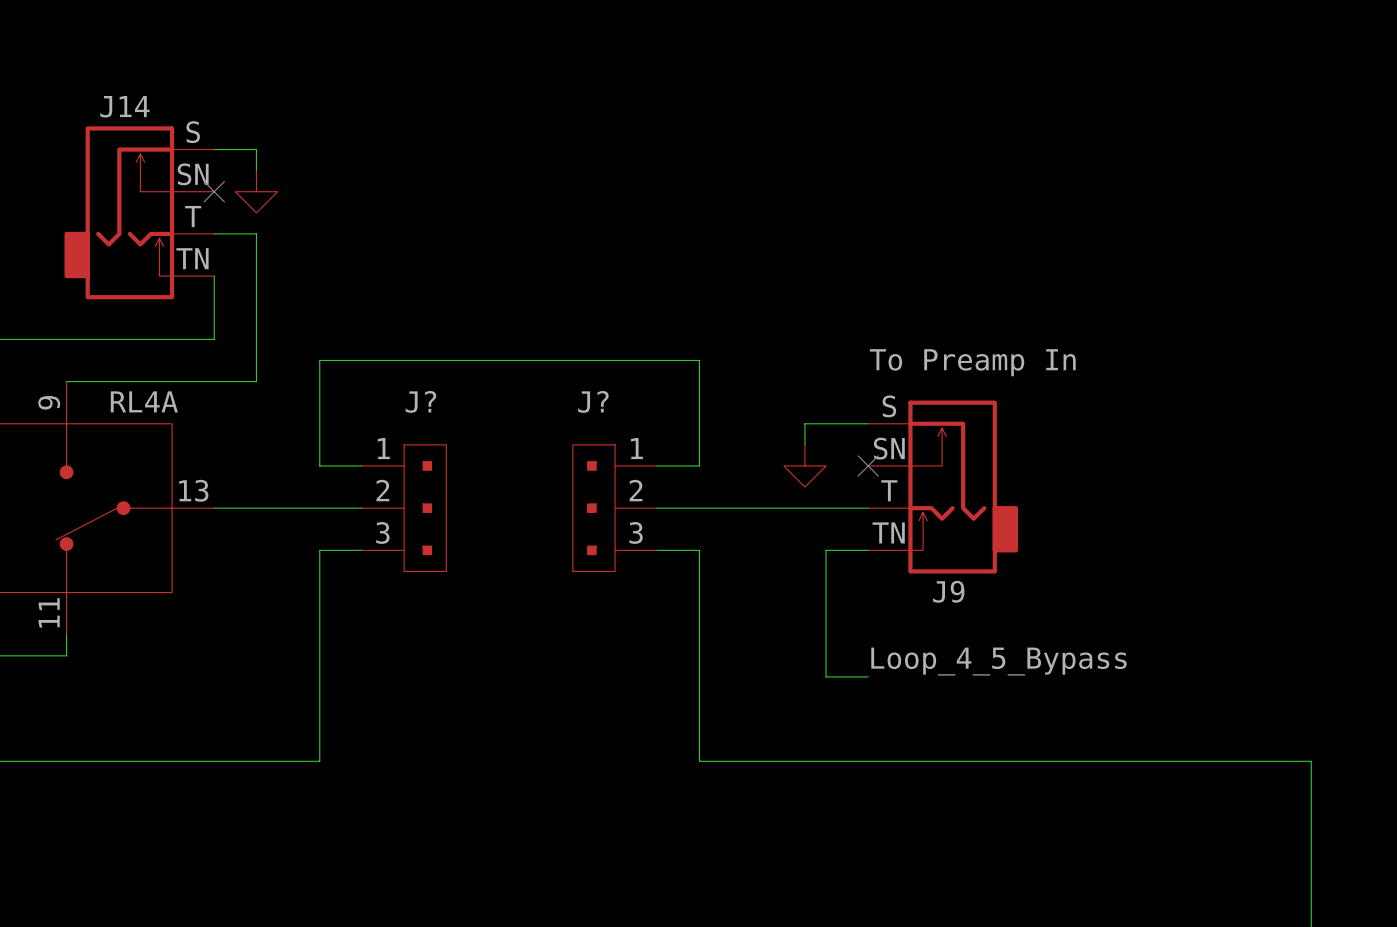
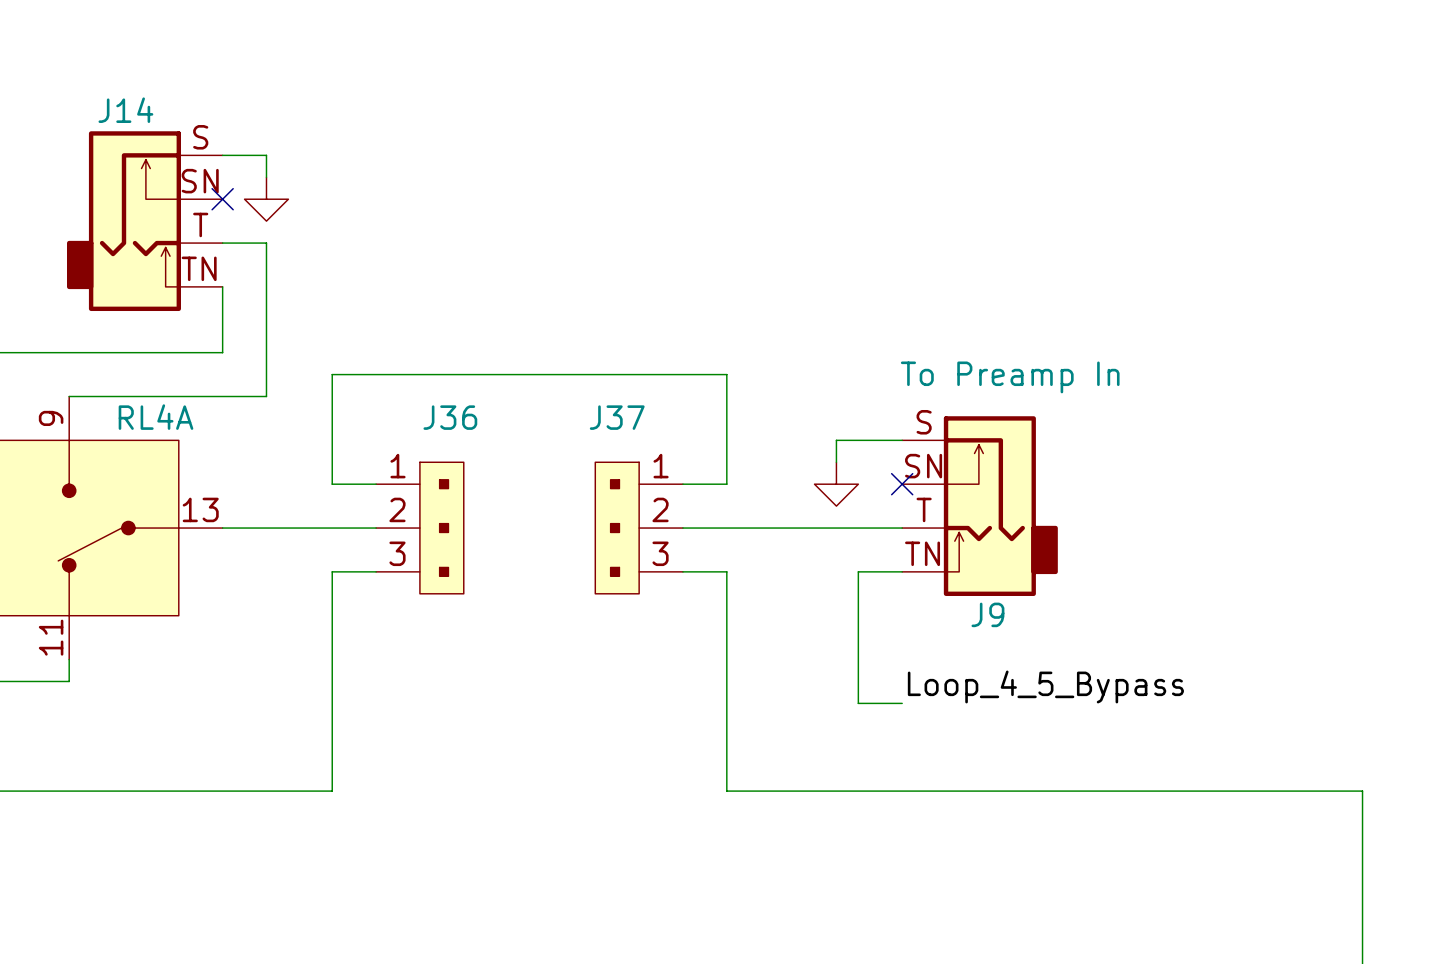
J? name: J? (420, 401) -> J36 (450, 417)
J? name: J? (593, 401) -> J37 (617, 417)

